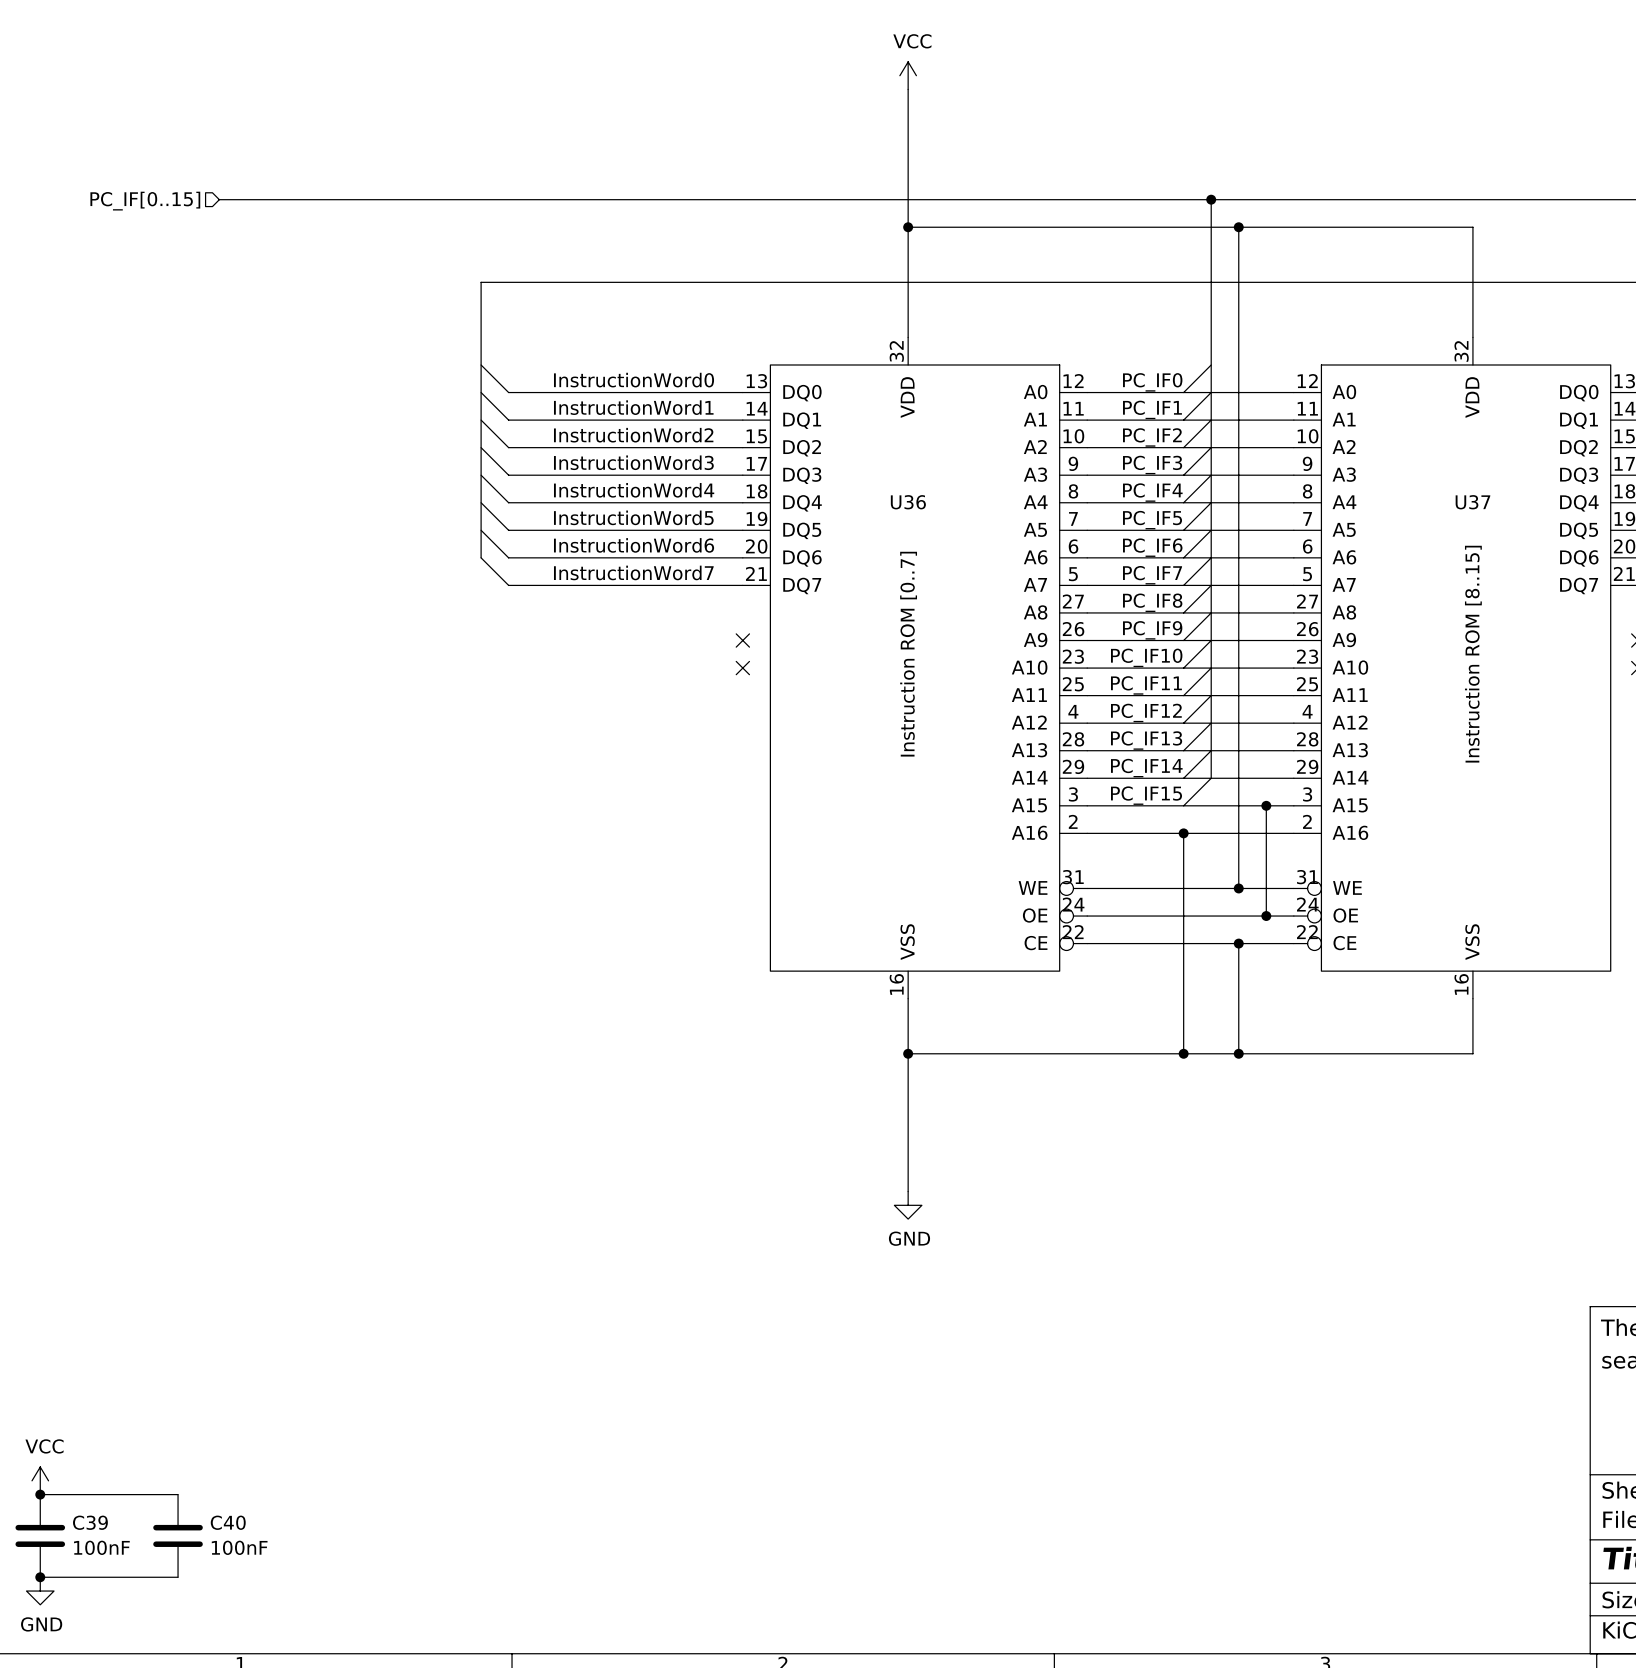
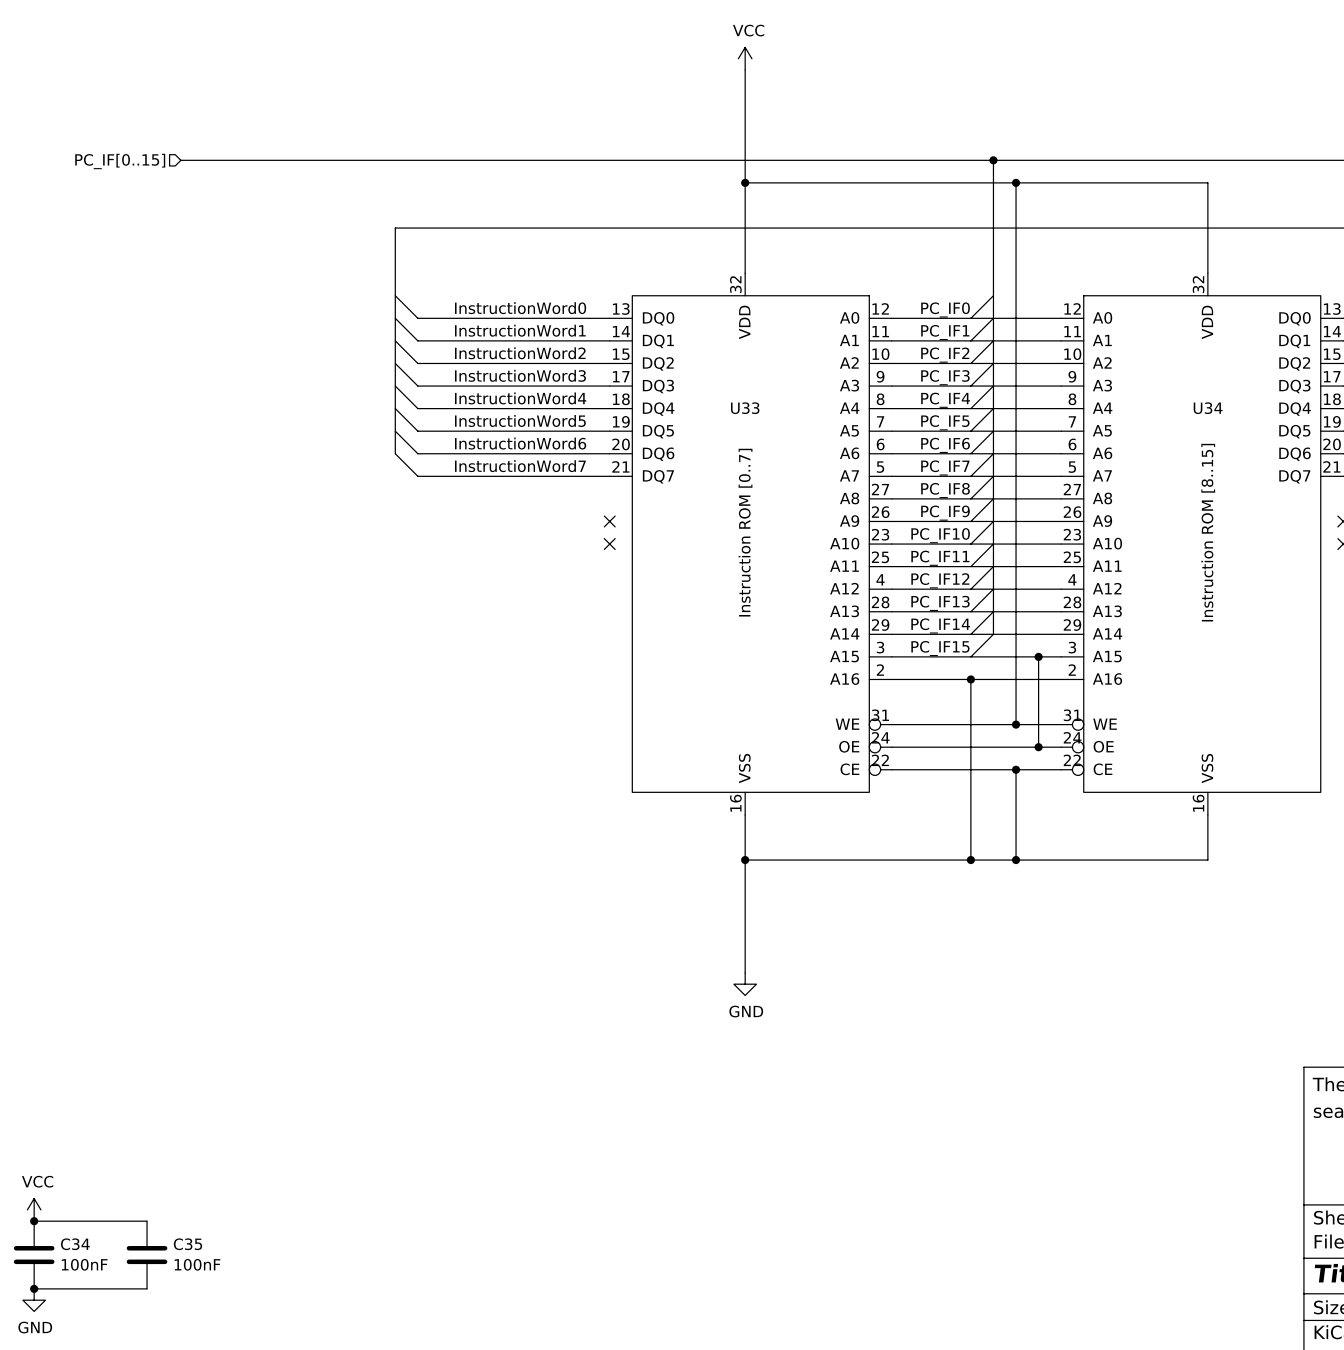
U36 name: U36 (908, 502) -> U33 (745, 408)
U37 name: U37 (1472, 502) -> U34 (1208, 408)
C39 name: C39 (90, 1522) -> C34 (75, 1244)
C40 name: C40 (228, 1522) -> C35 (187, 1244)

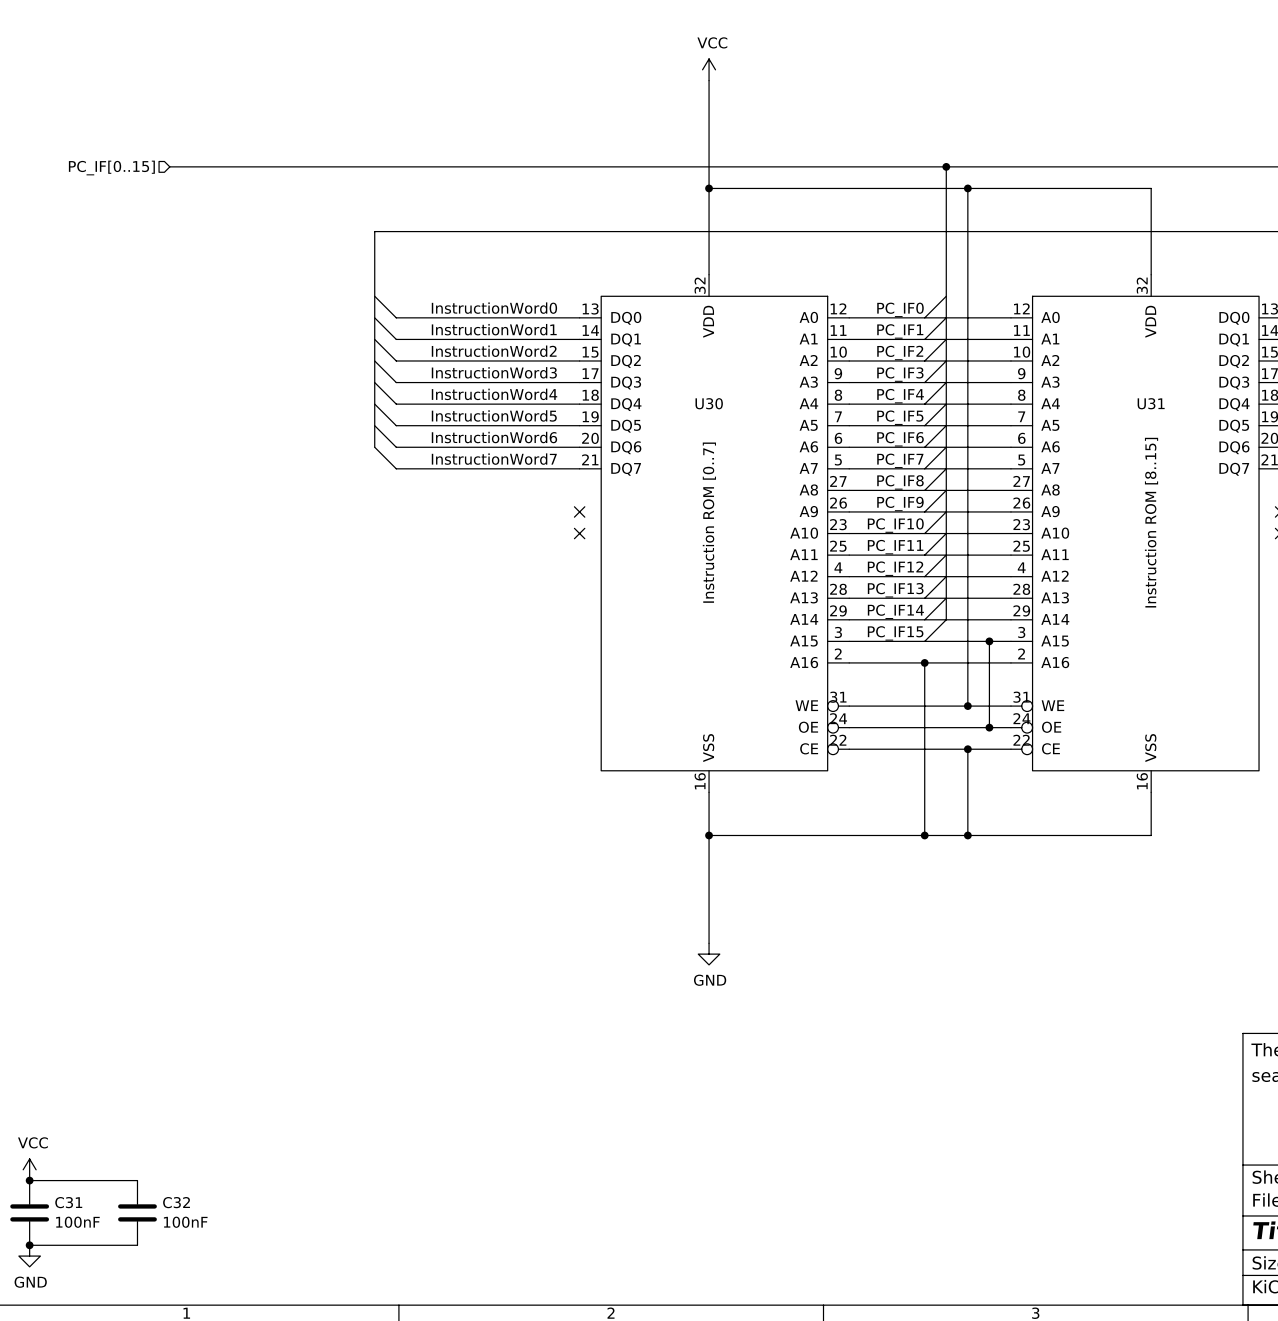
U33 name: U33 (745, 408) -> U30 (709, 403)
U34 name: U34 (1208, 408) -> U31 (1151, 403)
C34 name: C34 (75, 1244) -> C31 (68, 1202)
C35 name: C35 (187, 1244) -> C32 (176, 1202)

